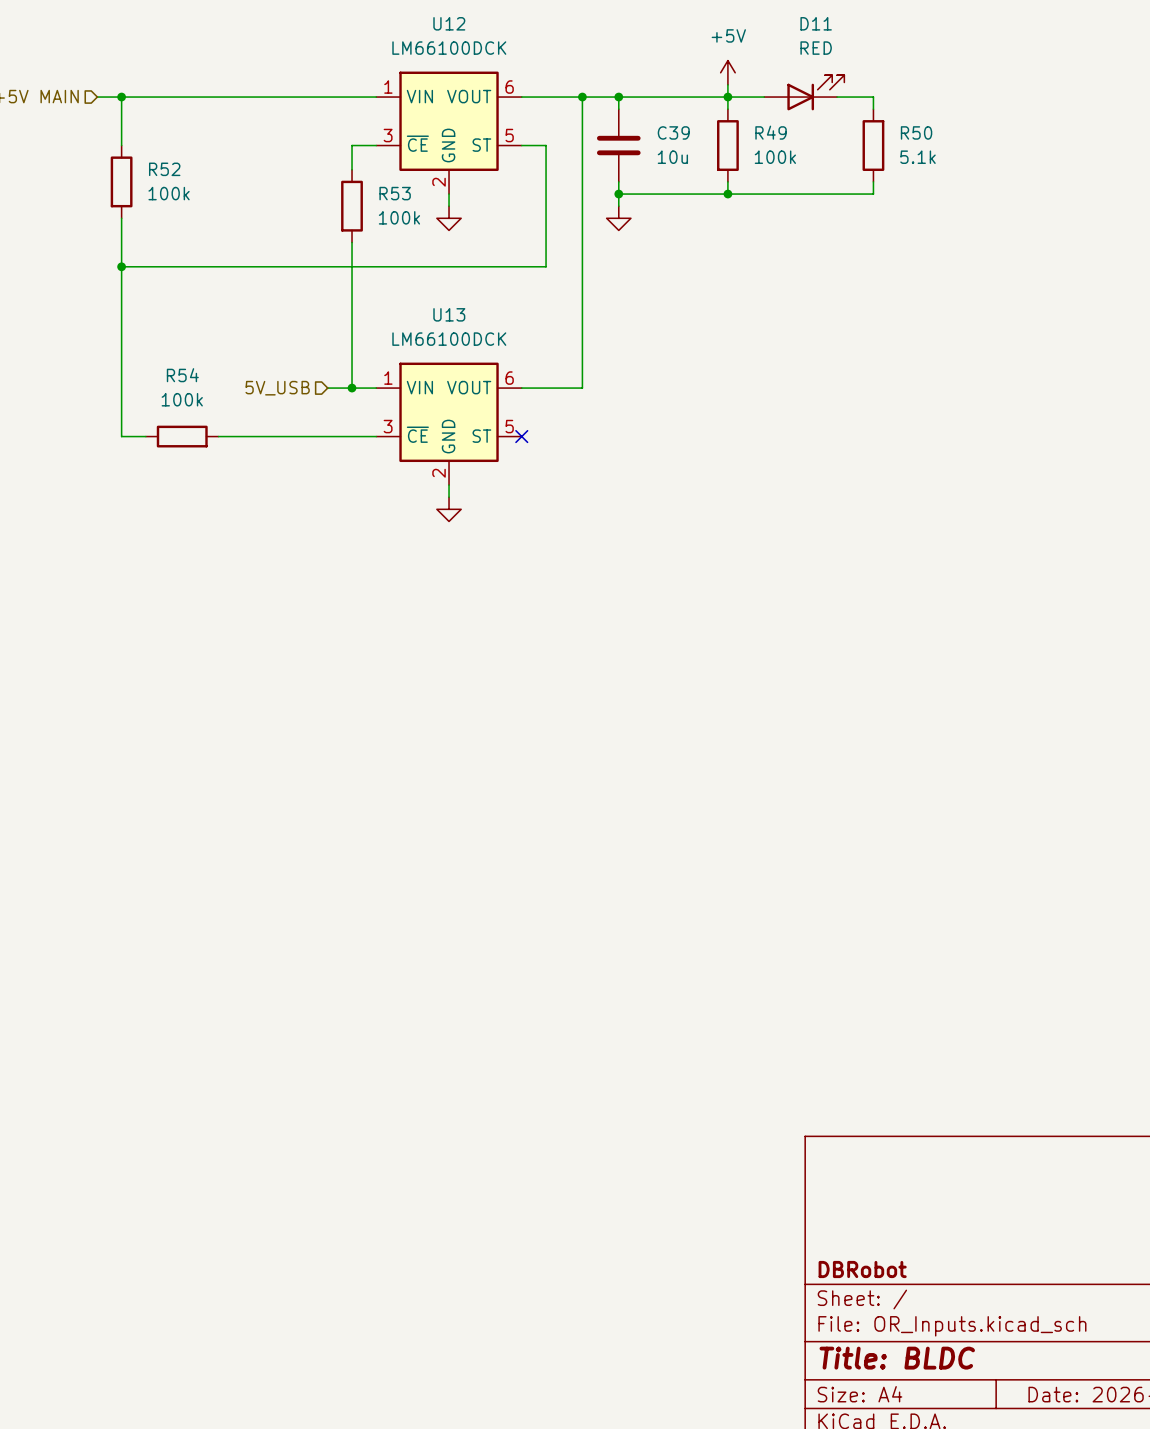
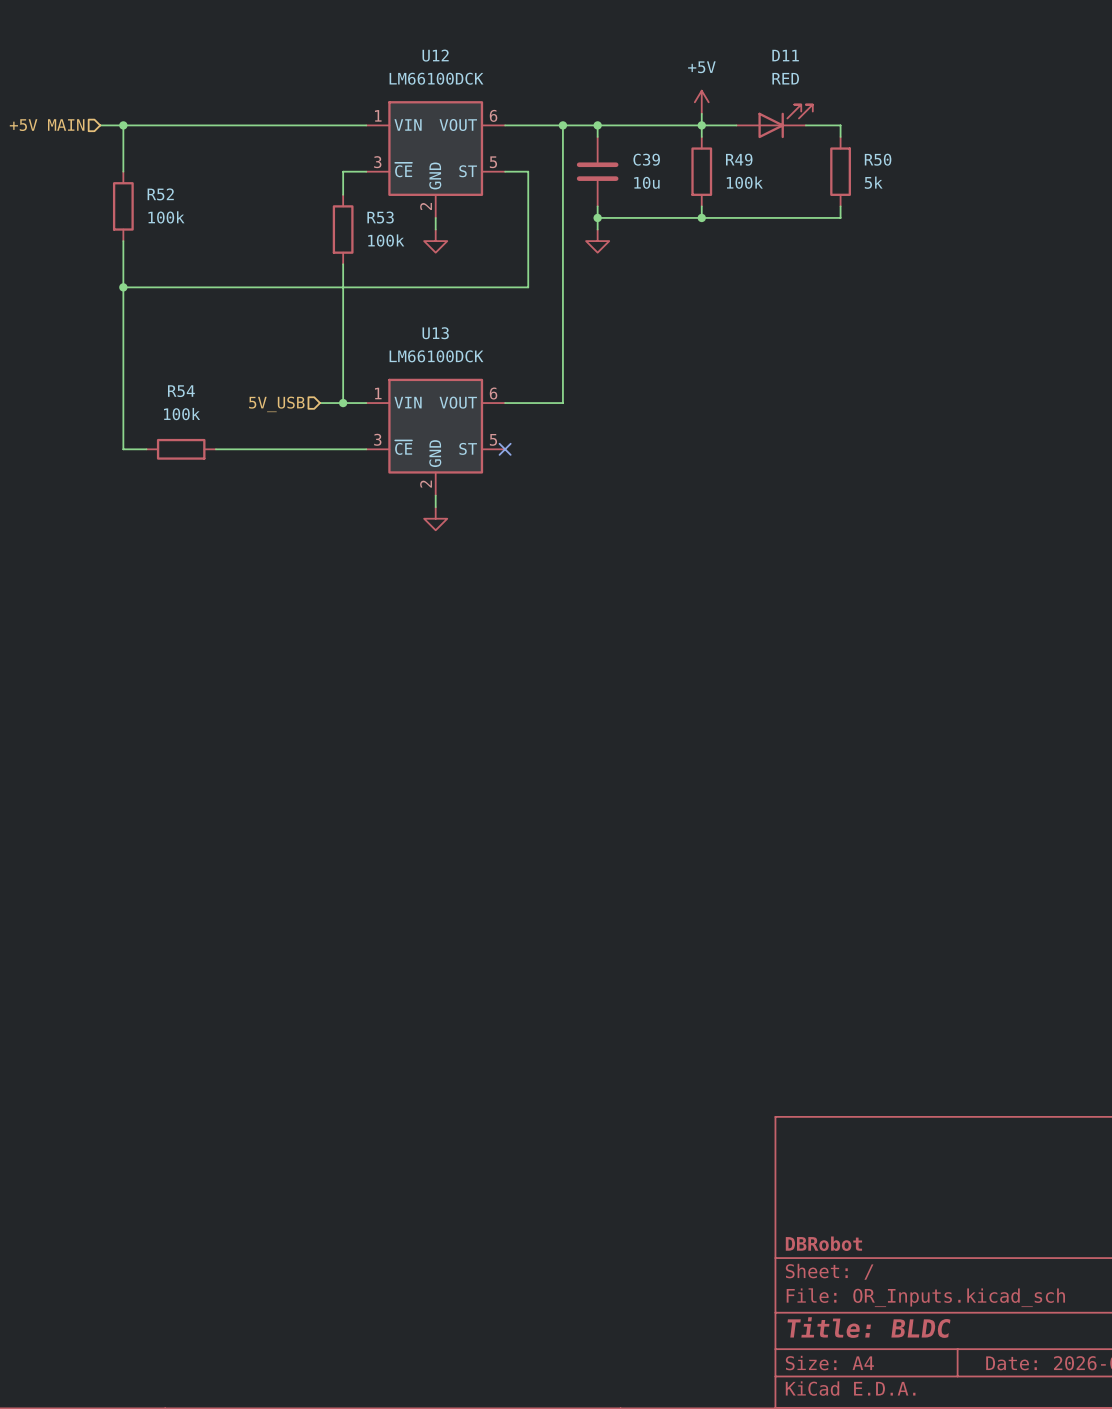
R50 value: 5.1k (917, 157) -> 5k (873, 182)

